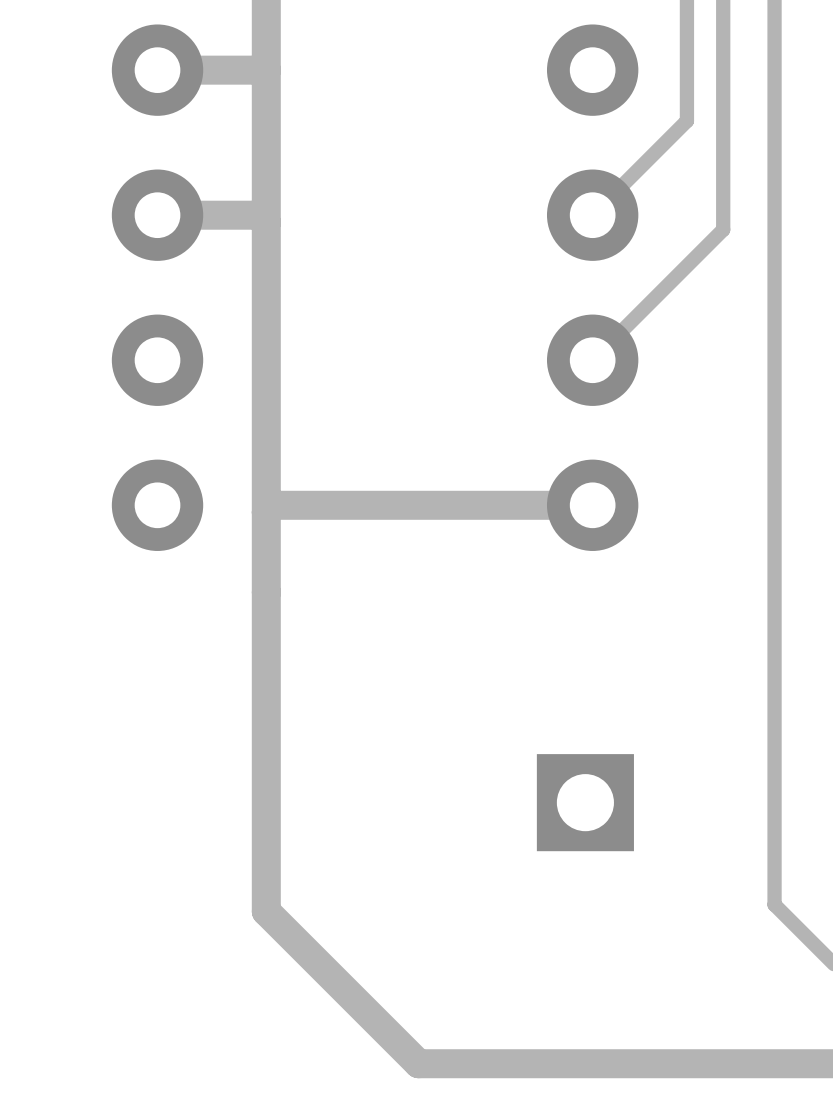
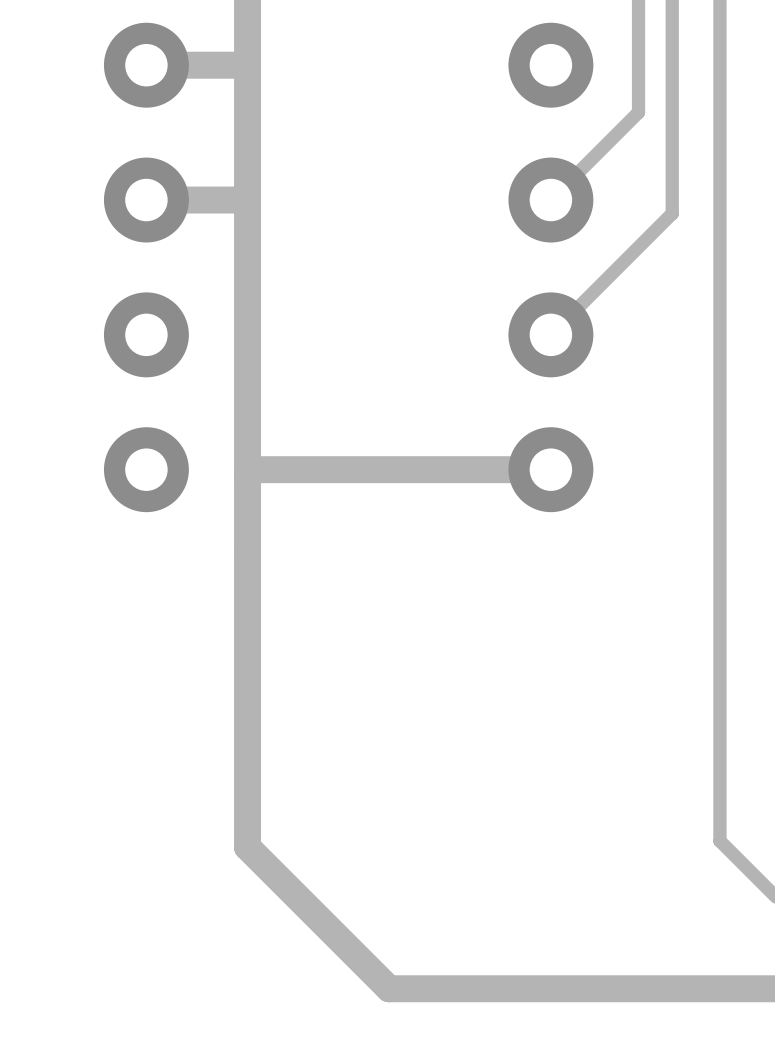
part: (585, 802) -> none

